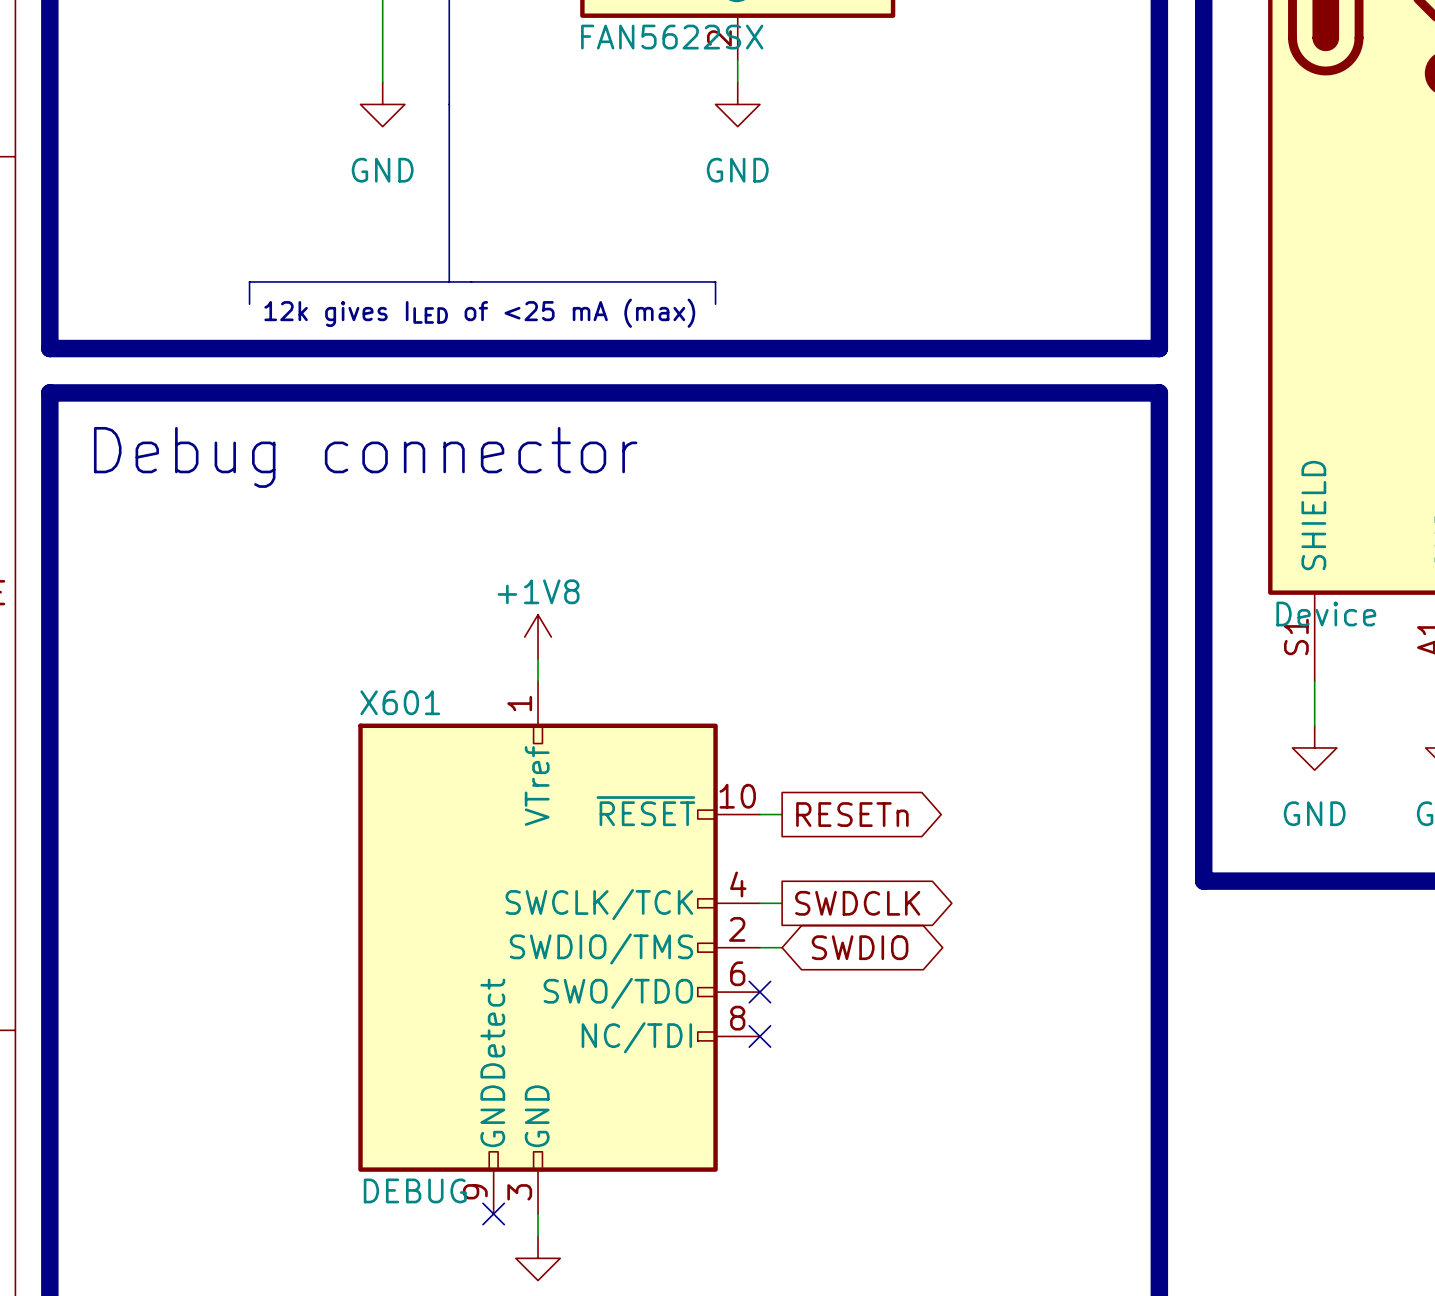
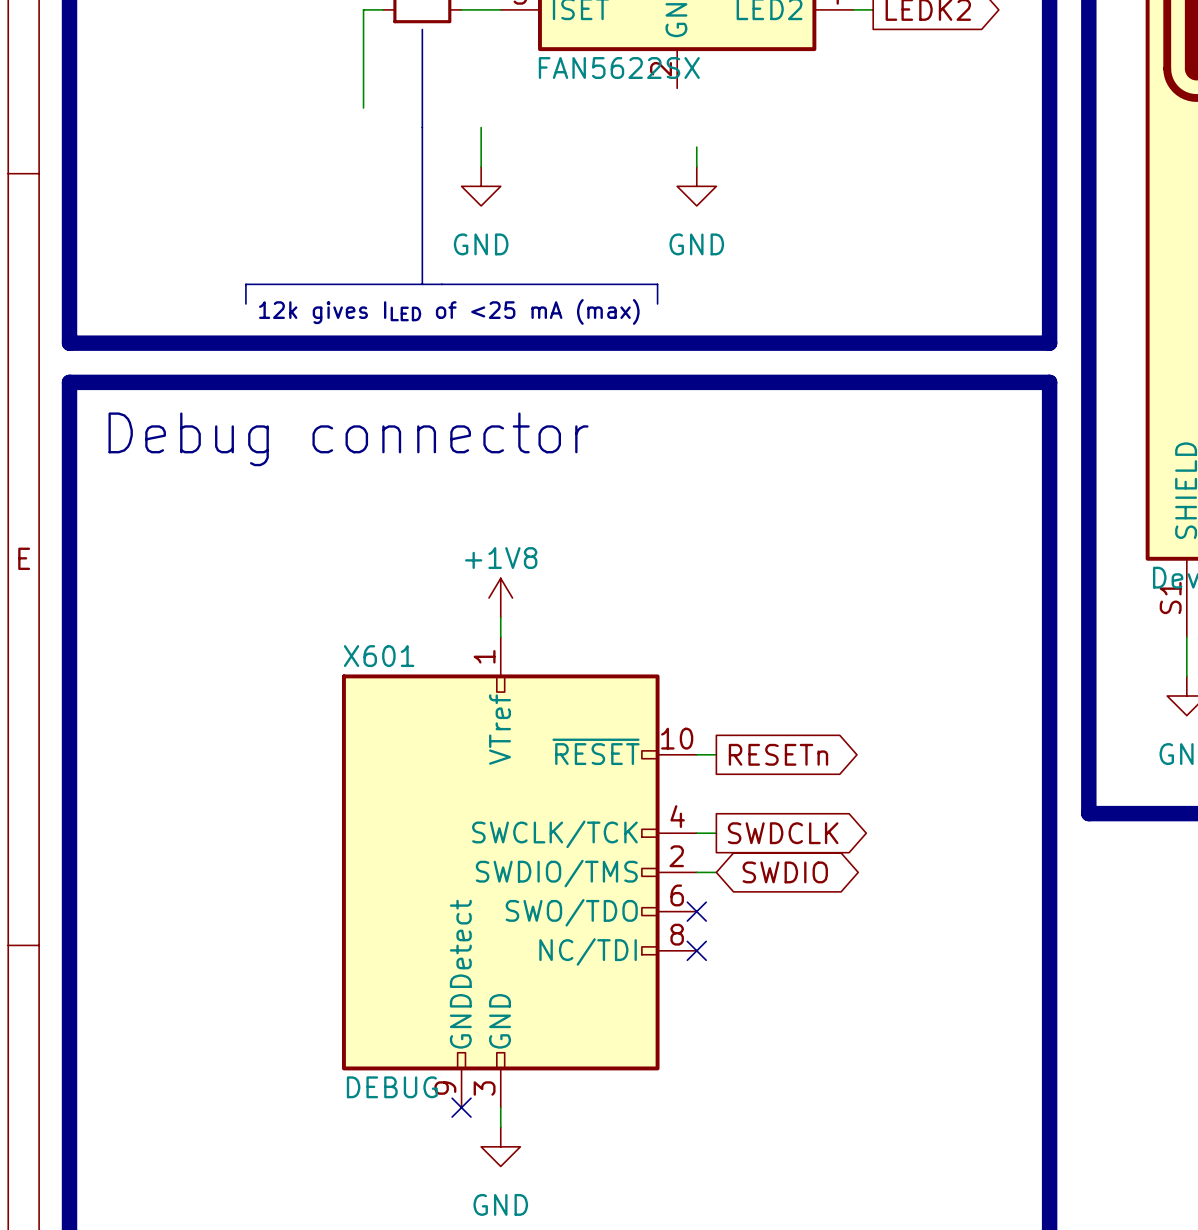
wire: (737, 60) (737, 82) -> (696, 147) (696, 166)
power symbol: GND (382, 104) -> none
wire: none -> (481, 127) (481, 166)
power symbol position: GND (737, 104) -> GND (696, 186)
power symbol: none -> GND (481, 186)

